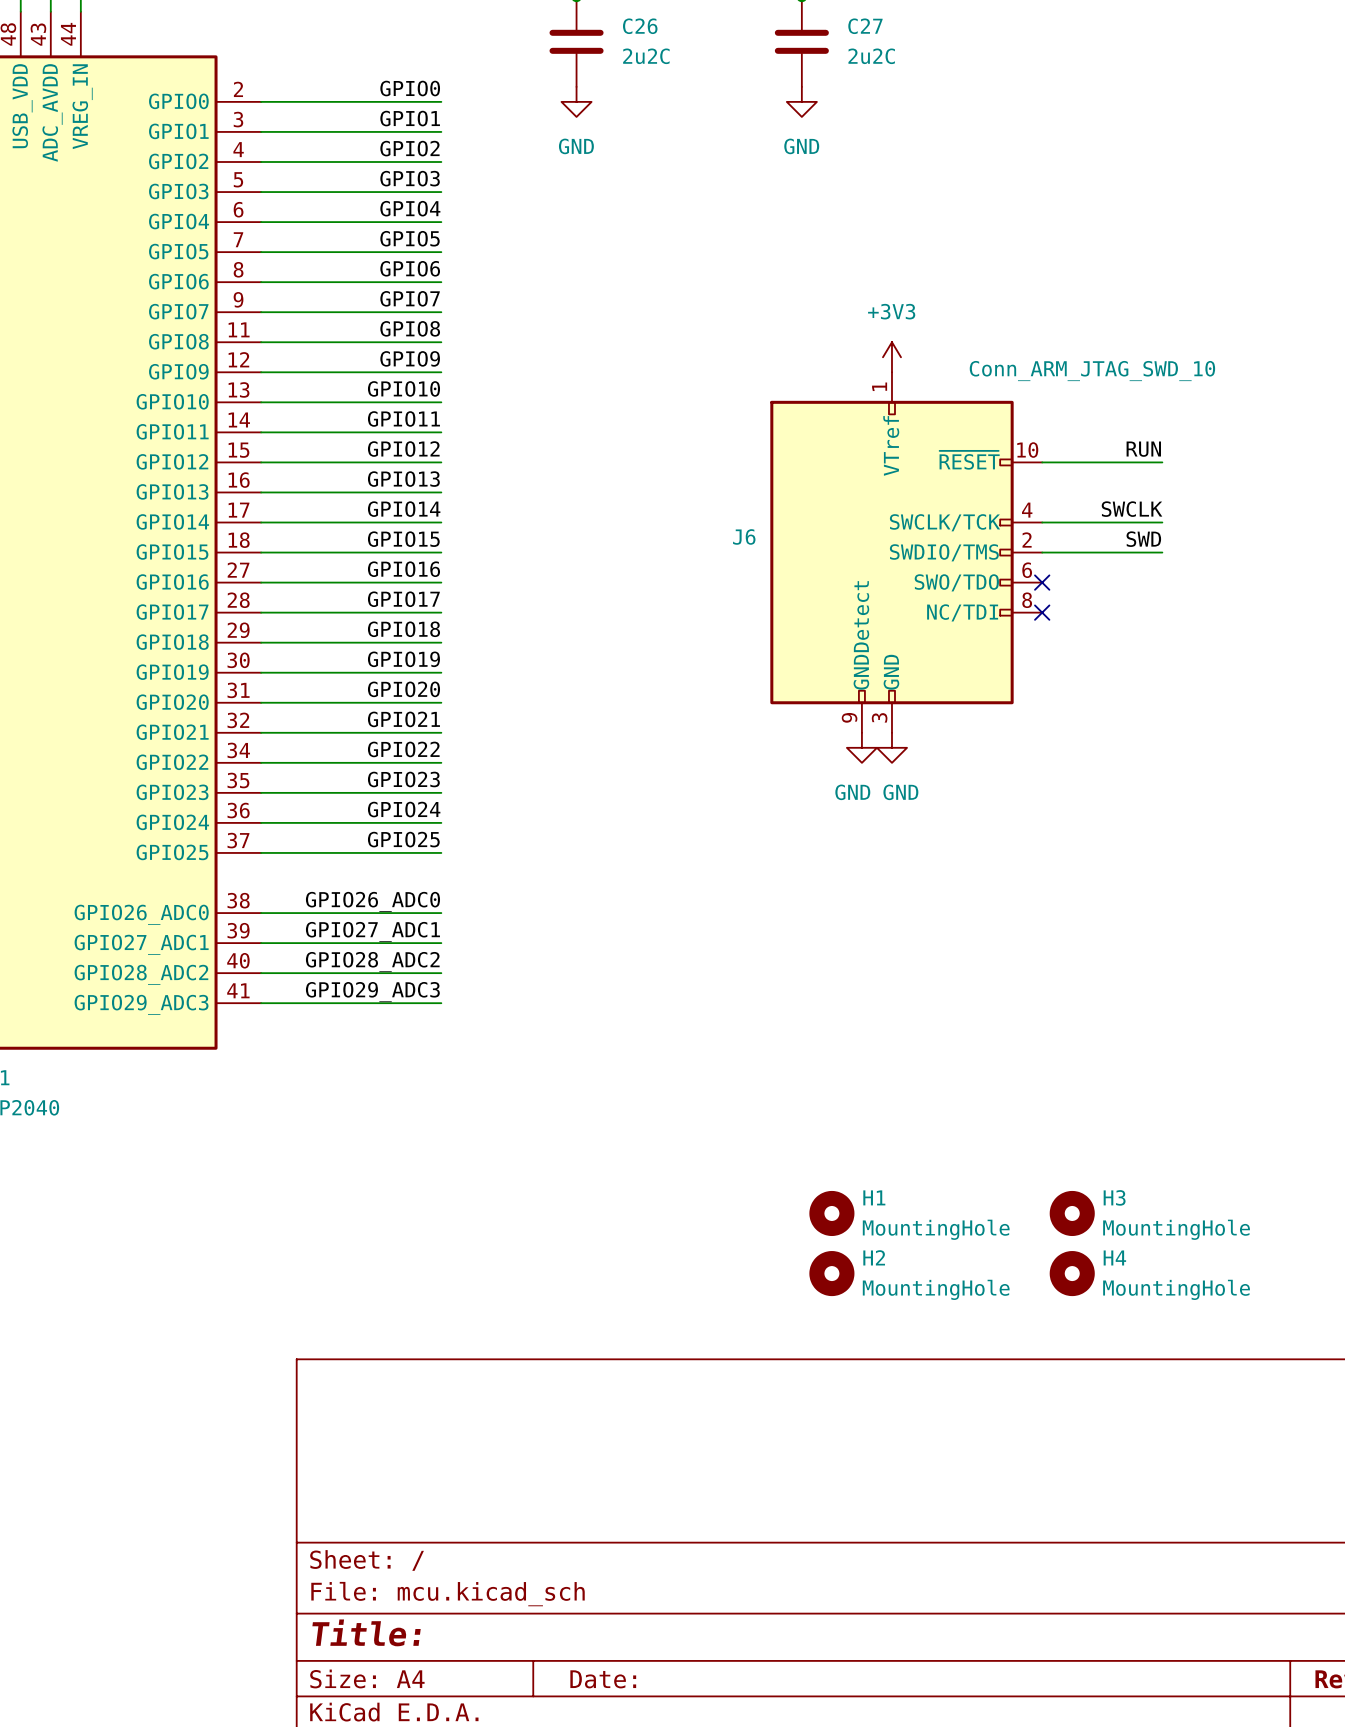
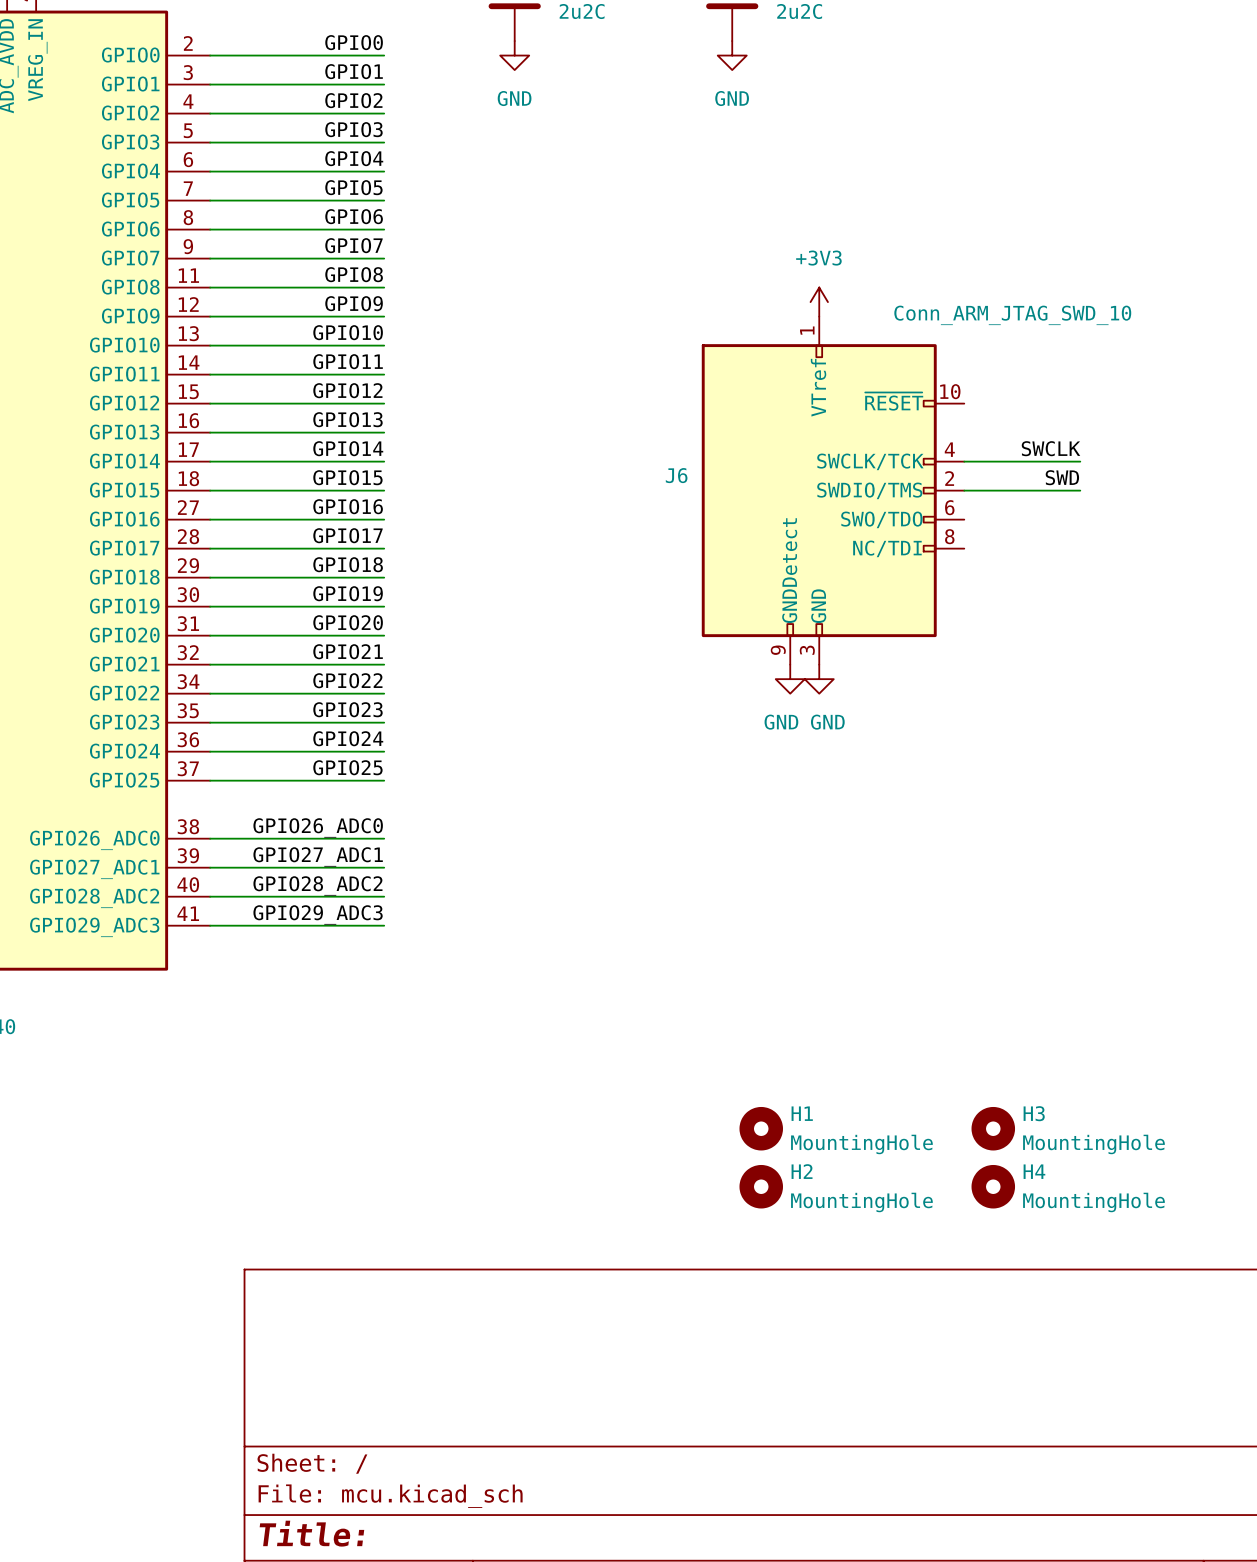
label: RUN (1143, 449) -> none
wire: (1042, 462) (1162, 462) -> none
no-connect mark: (1042, 582) -> none
no-connect mark: (1042, 612) -> none

